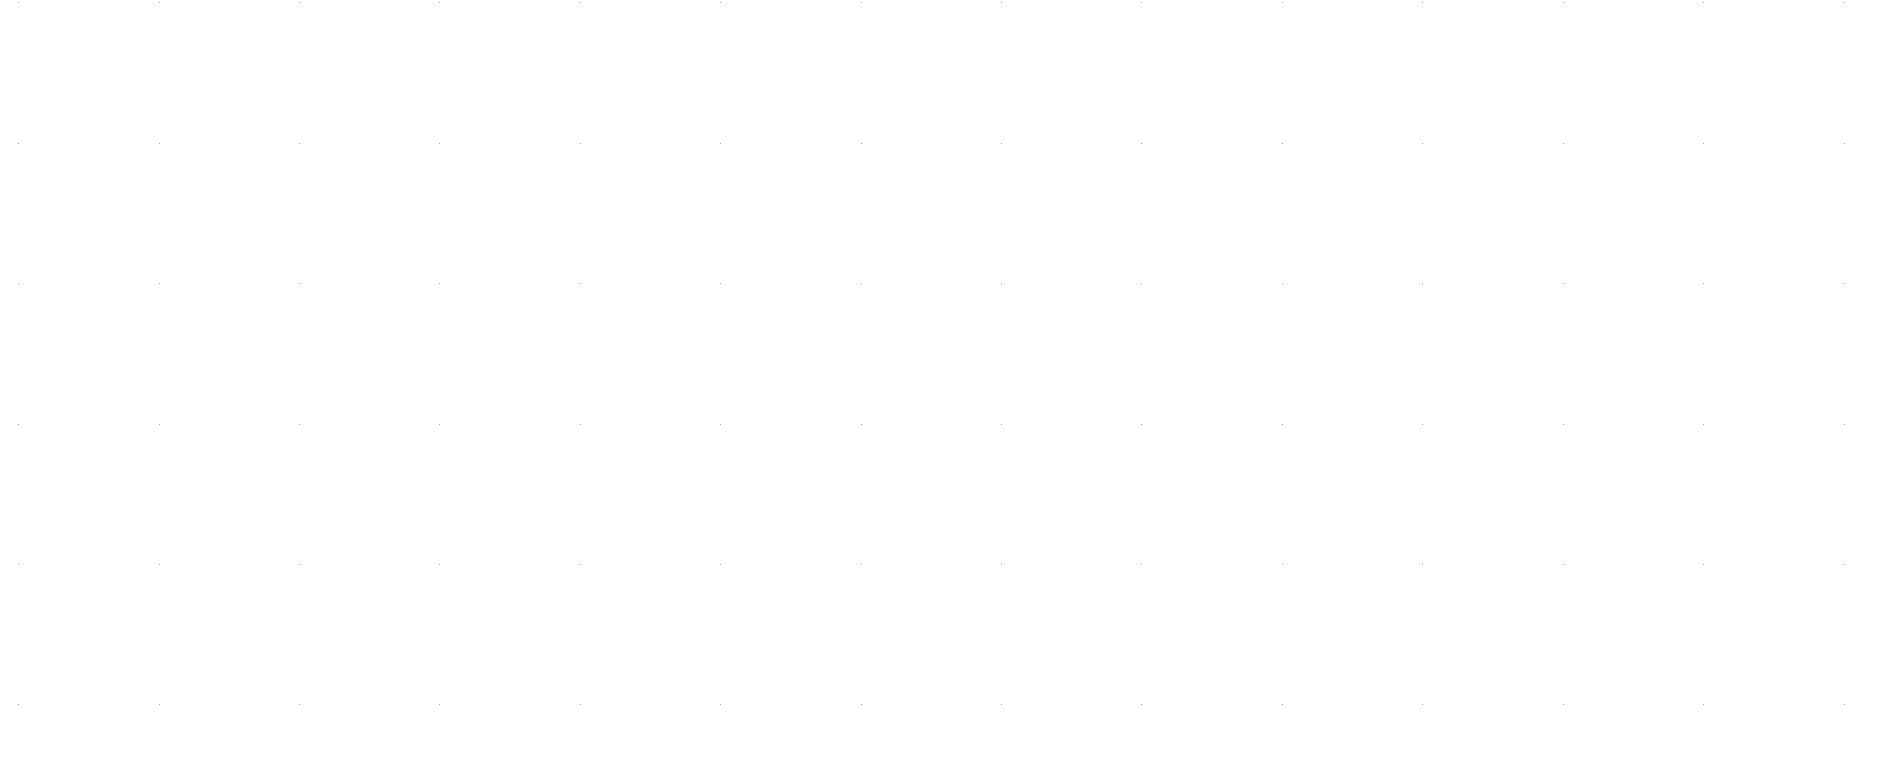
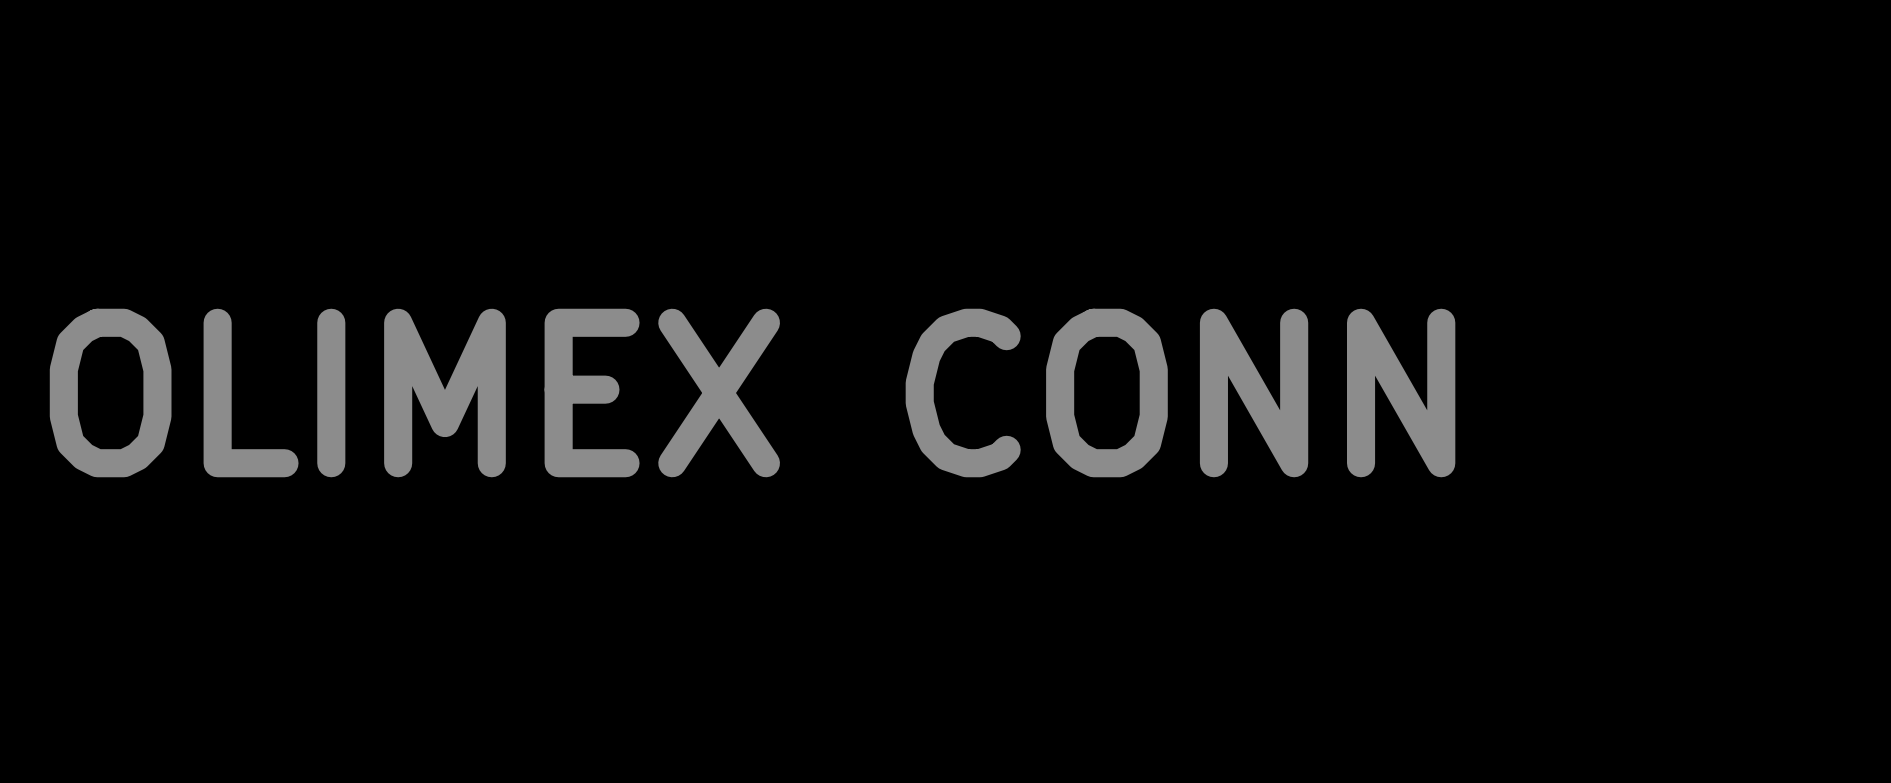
text: none -> OLIMEX CONN (752, 393)

